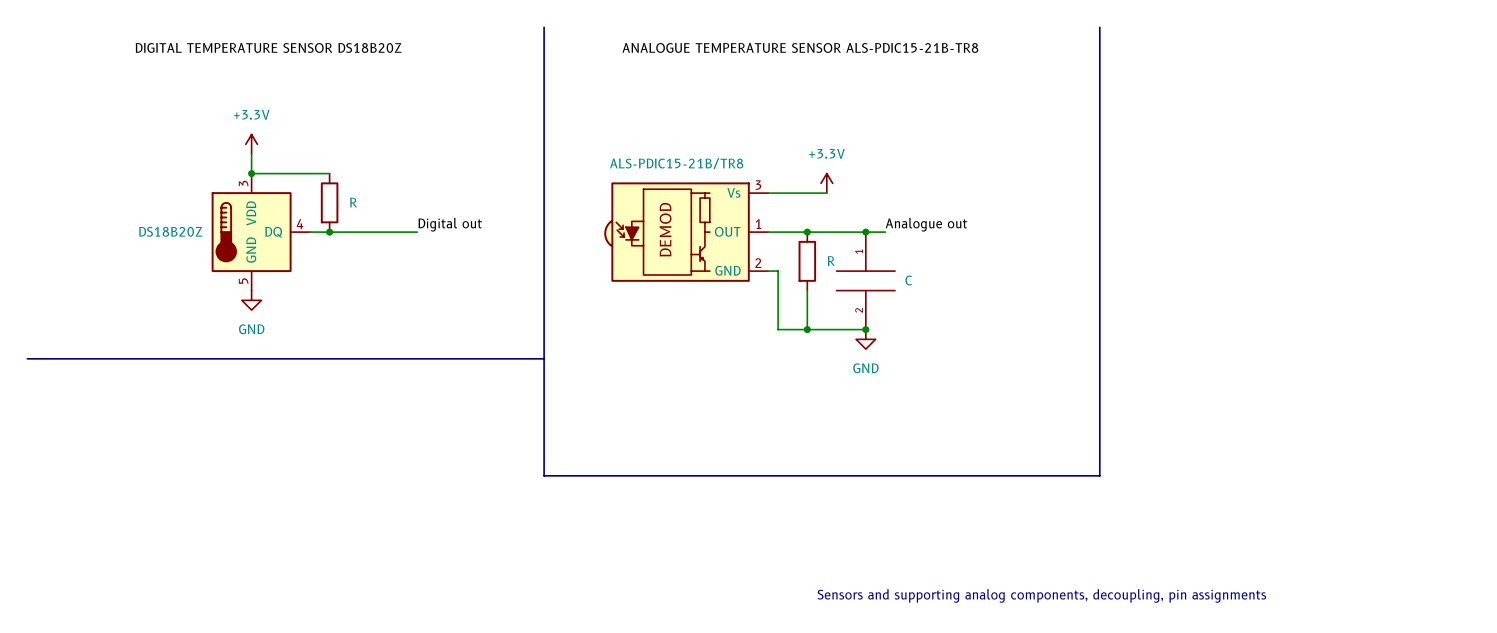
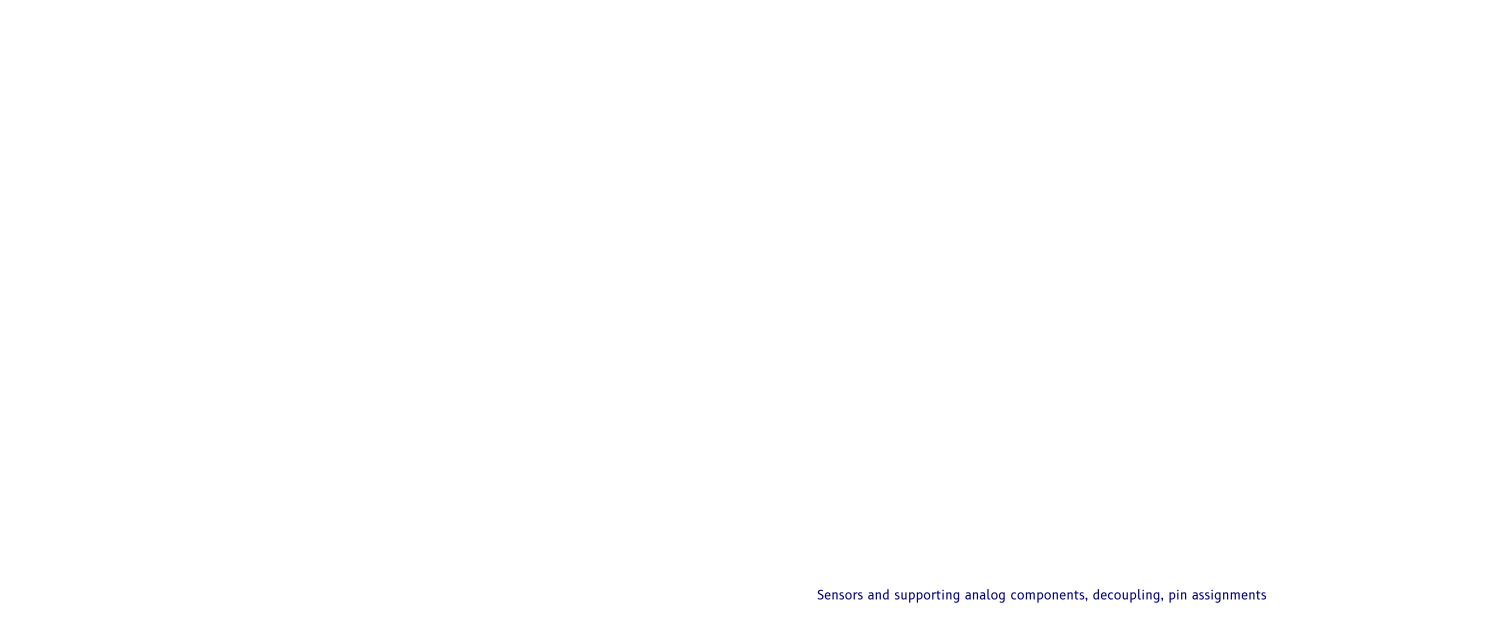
line: (544, 27) (544, 475) (1099, 475) (1099, 27) -> none
label: DIGITAL TEMPERATURE SENSOR DS18B20Z (268, 47) -> none
label: ANALOGUE TEMPERATURE SENSOR ALS-PDIC15-21B-TR8 (800, 47) -> none
power symbol: +3.3V (251, 144) -> none
wire: (251, 154) (251, 173) (329, 173) -> none
junction: (251, 173) -> none
power symbol: +3.3V (826, 183) -> none
wire: (768, 193) (826, 193) -> none
part: R (329, 202) -> none
label: Digital out (450, 224) -> none
label: Analogue out (926, 224) -> none
part: DS18B20Z (260, 232) -> none
wire: (310, 232) (417, 232) -> none
junction: (329, 232) -> none
part: ALS-PDIC15-21B/TR8 (686, 232) -> none
wire: (768, 232) (885, 232) -> none
junction: (807, 232) -> none
junction: (865, 232) -> none
part: R (807, 261) -> none
wire: (768, 271) (778, 271) (778, 329) (865, 329) -> none
part: C (865, 280) -> none
wire: (807, 290) (807, 329) -> none
power symbol: GND (251, 300) -> none
junction: (807, 329) -> none
junction: (865, 329) -> none
power symbol: GND (865, 339) -> none
line: (27, 358) (544, 358) -> none

